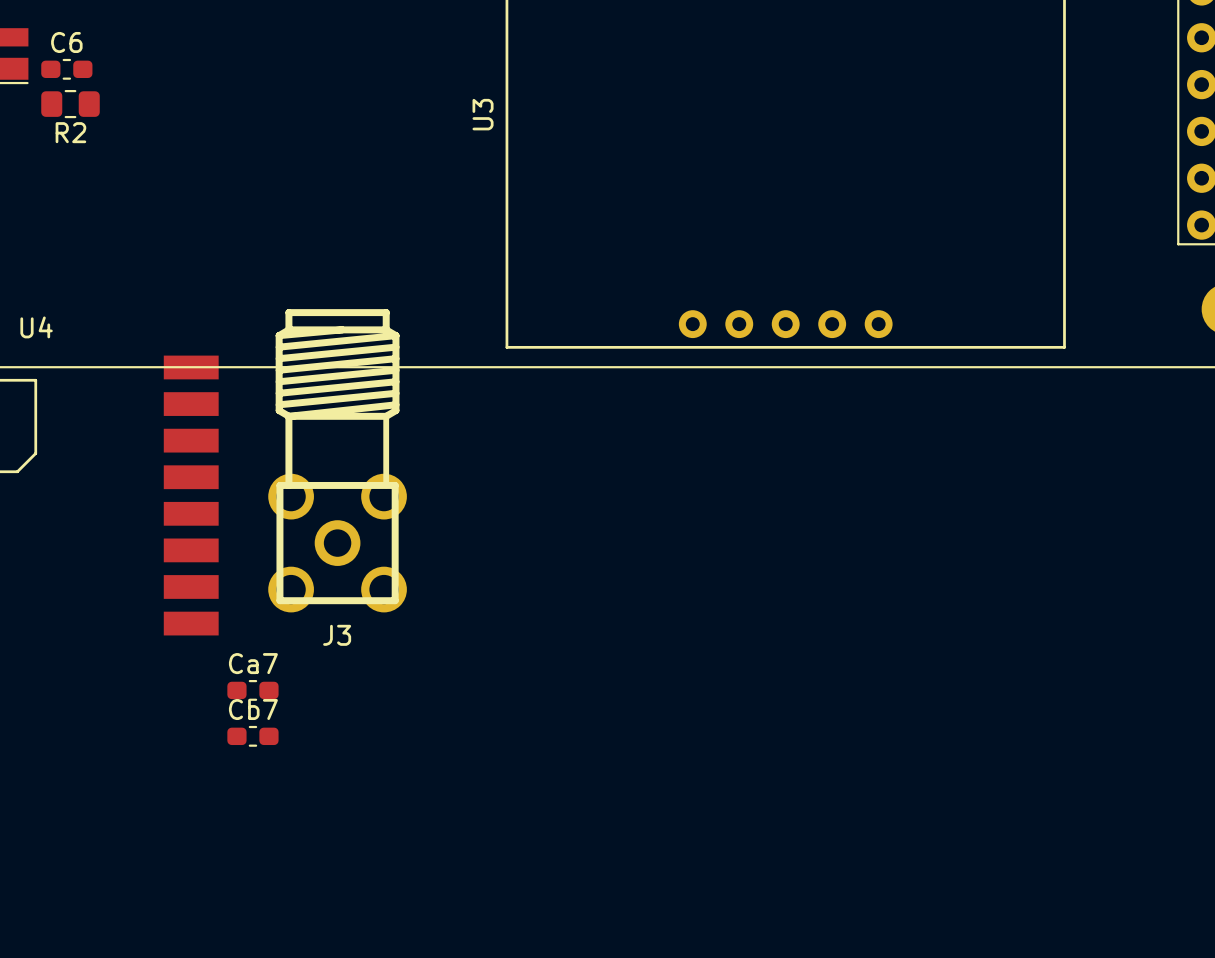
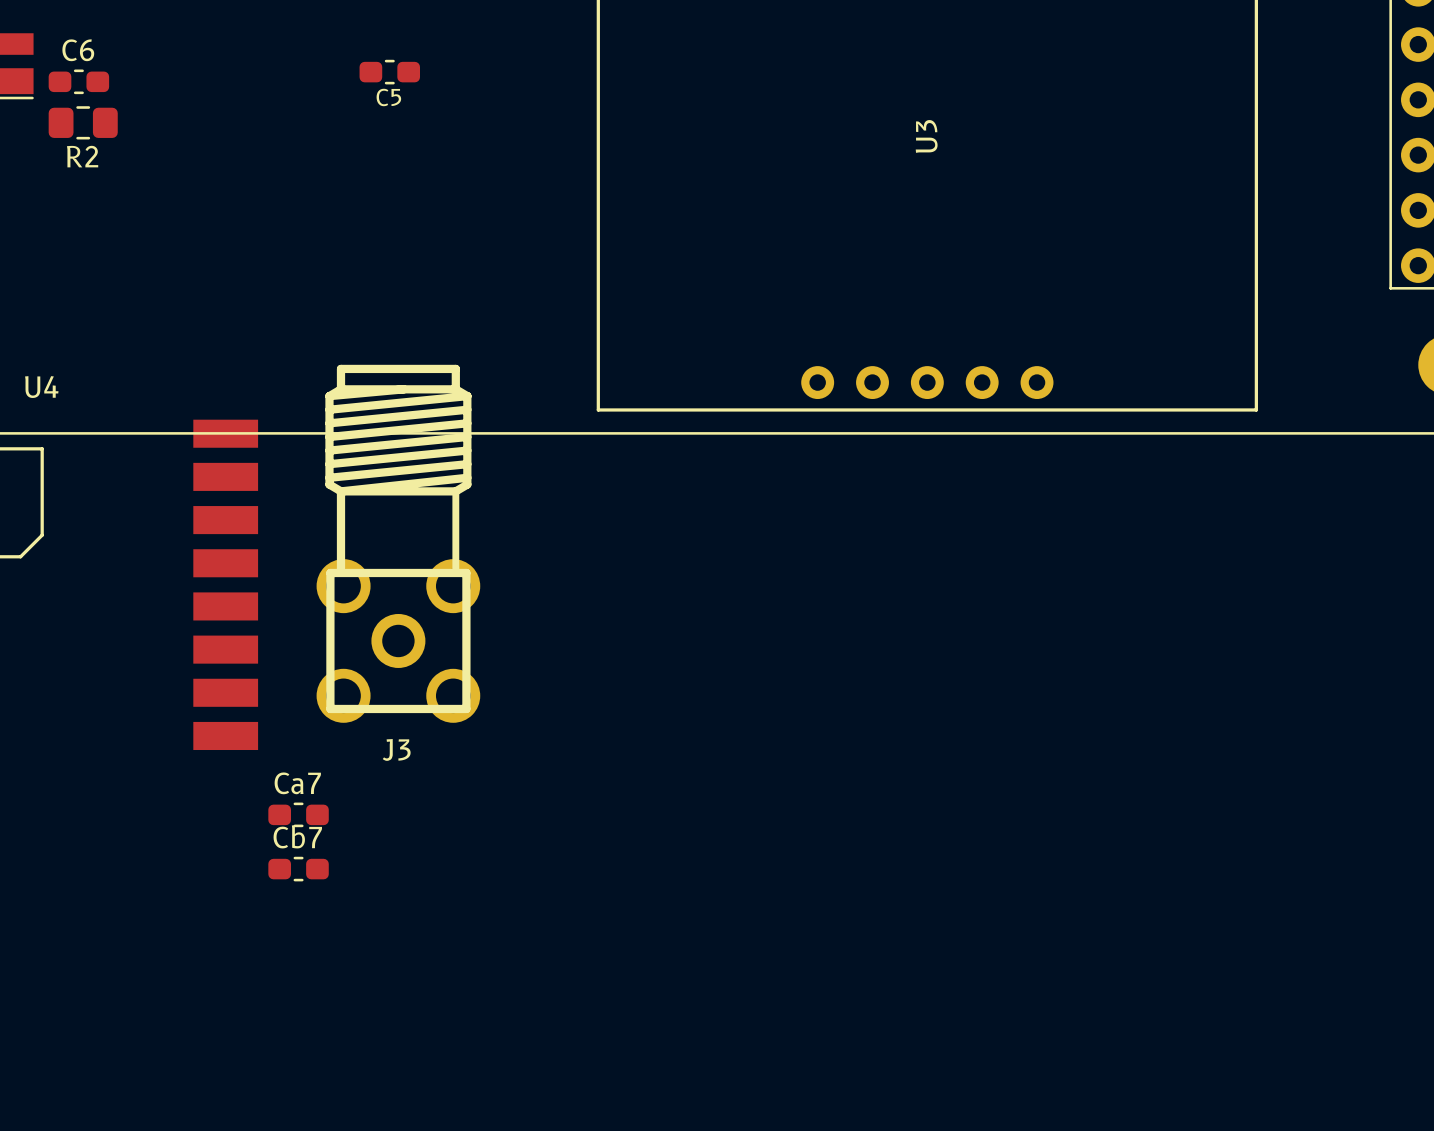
C5: none -> (389, 72)
U3 name position: U3 (483, 114) -> U3 (926, 136)

